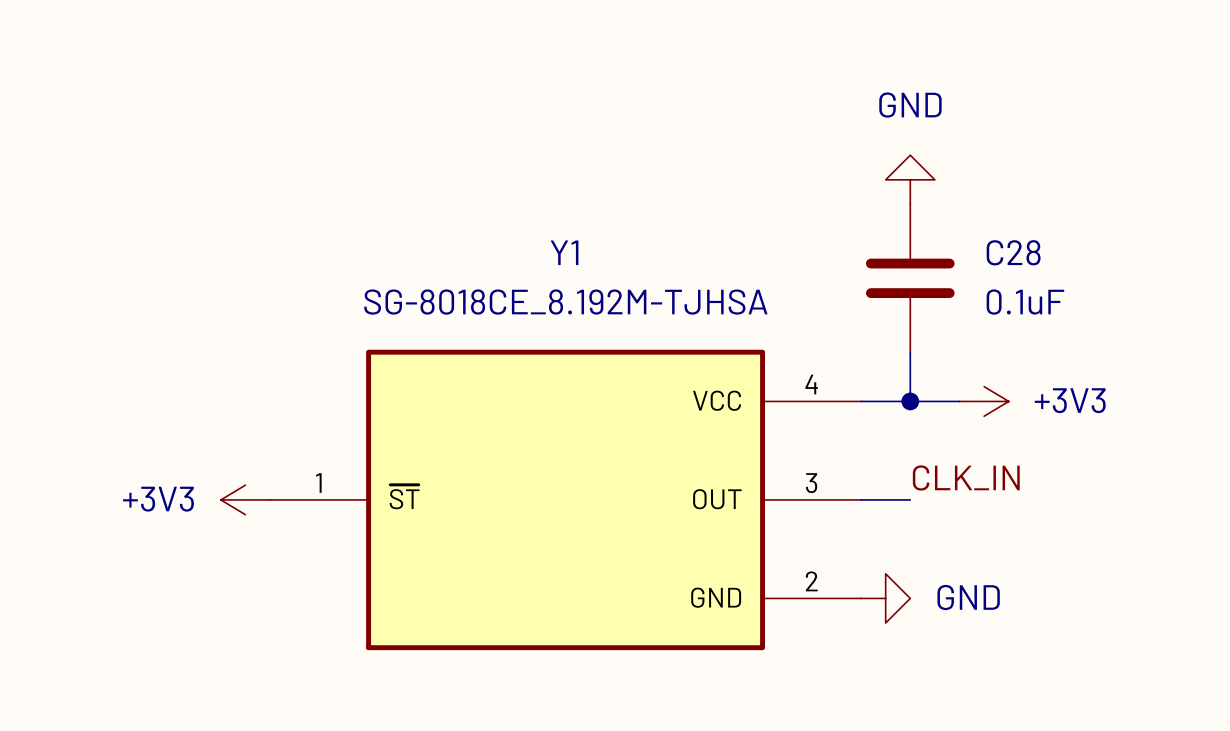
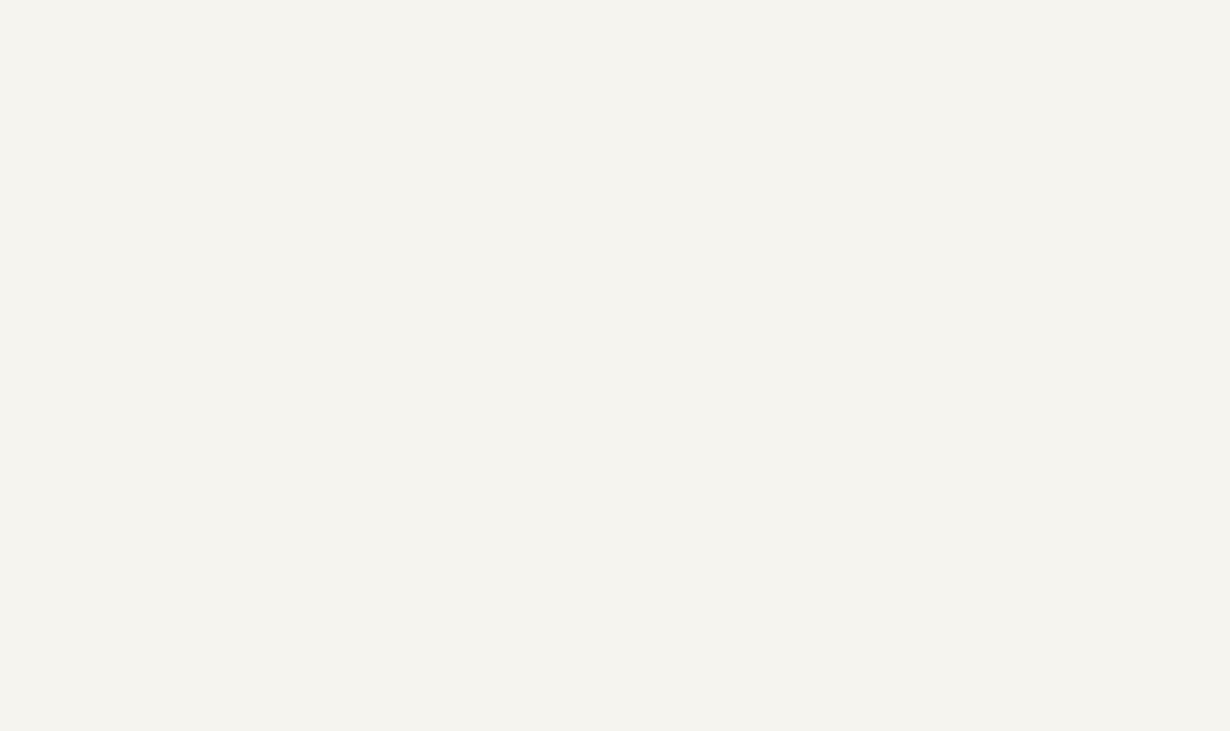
power symbol: GND (910, 179) -> none
C28: 0.1uF (910, 278) -> none
wire: (910, 352) (910, 401) -> none
wire: (861, 401) (959, 401) -> none
junction: (910, 401) -> none
power symbol: +3V3 (984, 401) -> none
label: CLK_IN (966, 477) -> none
power symbol: +3V3 (245, 499) -> none
Y1: SG-8018CE_8.192M-TJHSA (565, 499) -> none
wire: (861, 499) (910, 499) -> none
power symbol: GND (885, 598) -> none

